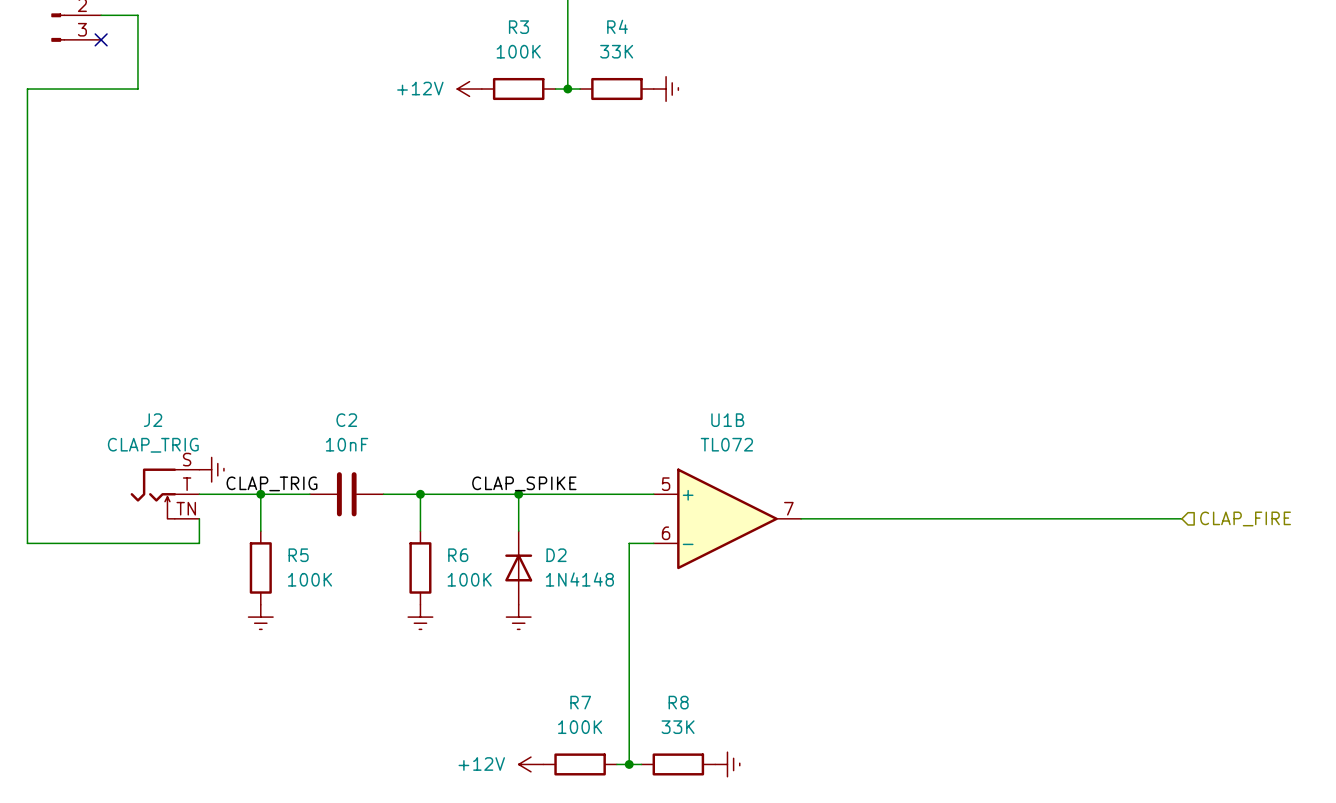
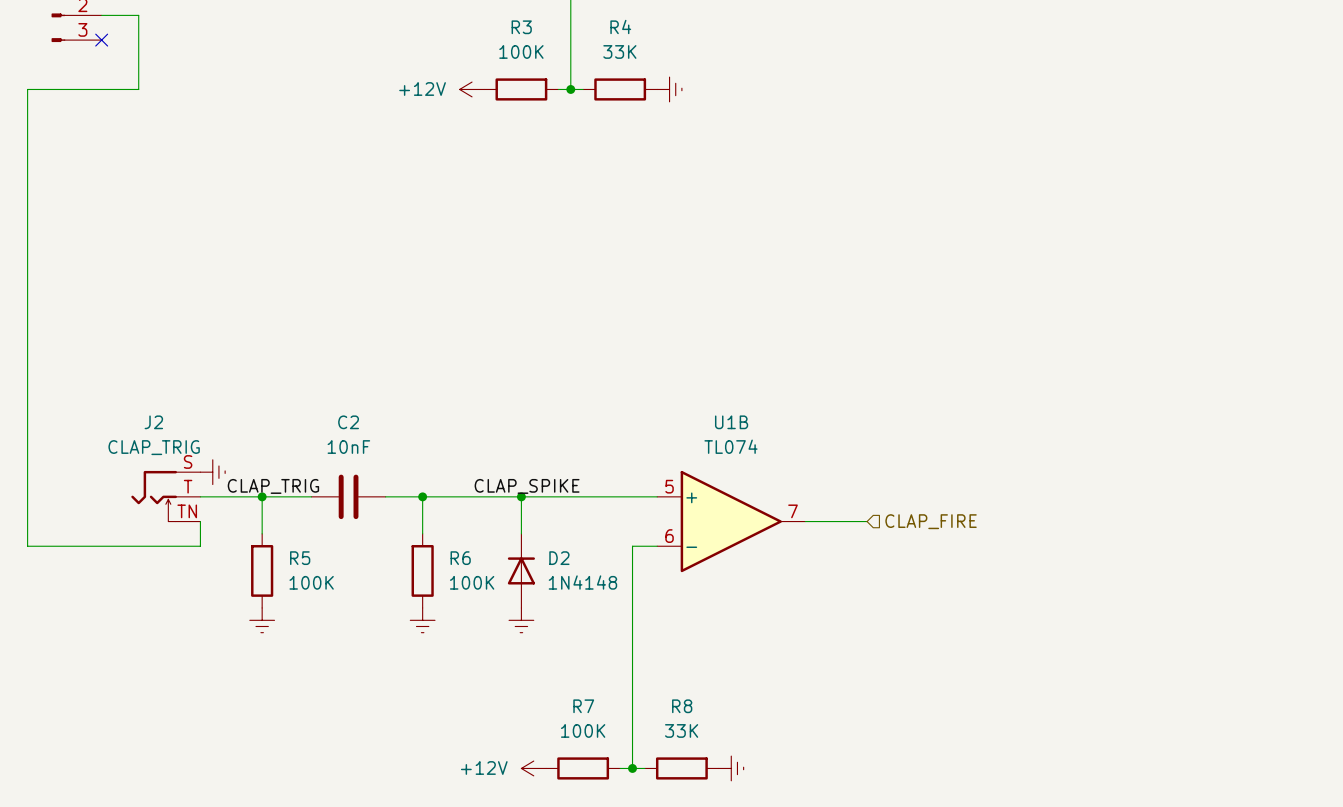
U1B value: TL072 (726, 444) -> TL074 (730, 446)
wire: (862, 518) (1181, 518) -> none
hierarchical label: none -> CLAP_FIRE (931, 521)
hierarchical label: CLAP_FIRE (1245, 518) -> none

